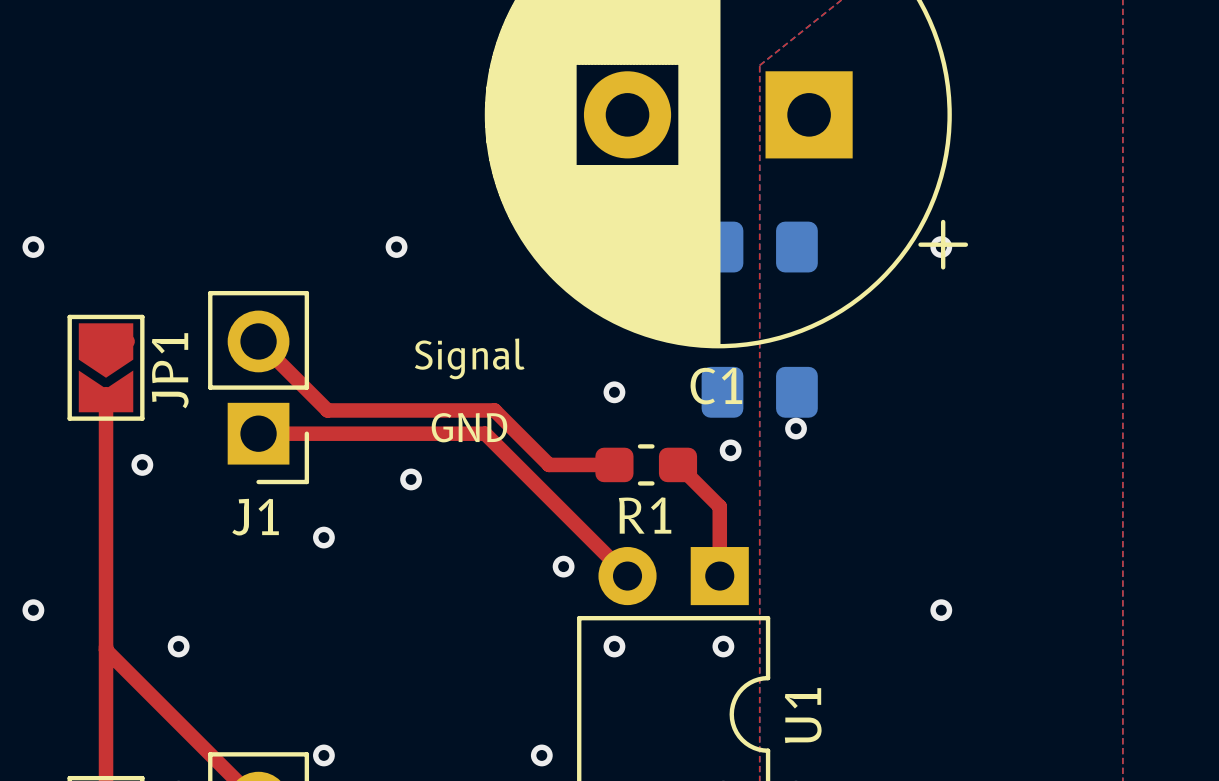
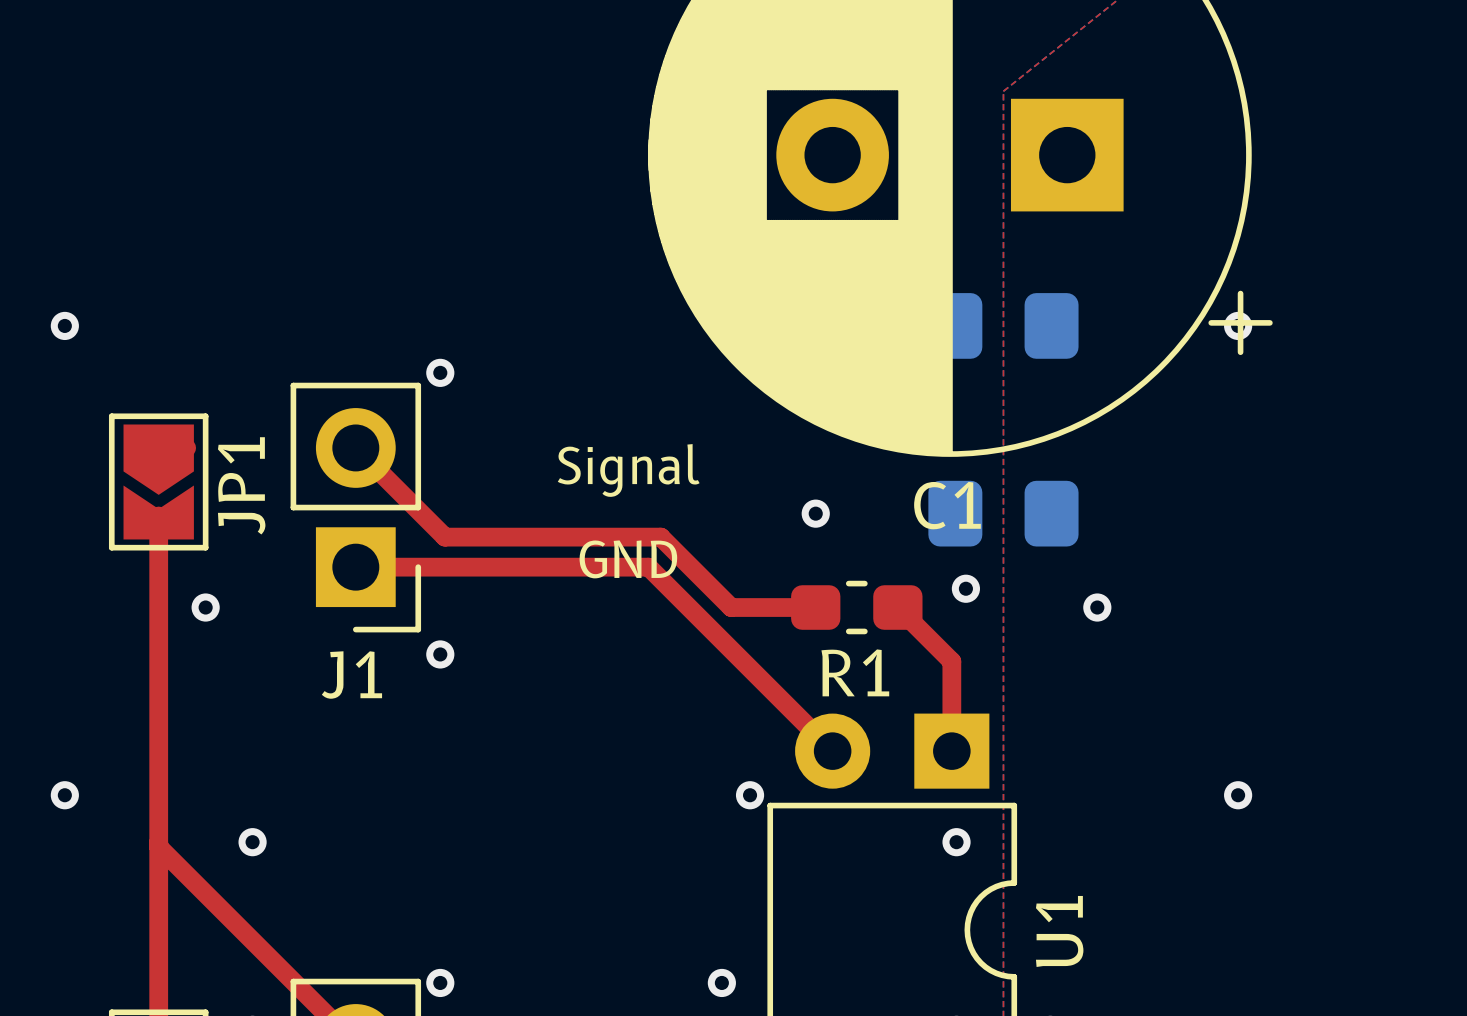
via position: (396, 247) -> (440, 372)
via position: (796, 428) -> (1097, 607)
via: (411, 479) -> none
via position: (323, 537) -> (440, 654)
via: (563, 566) -> none
via: none -> (750, 795)
via: (614, 646) -> none

